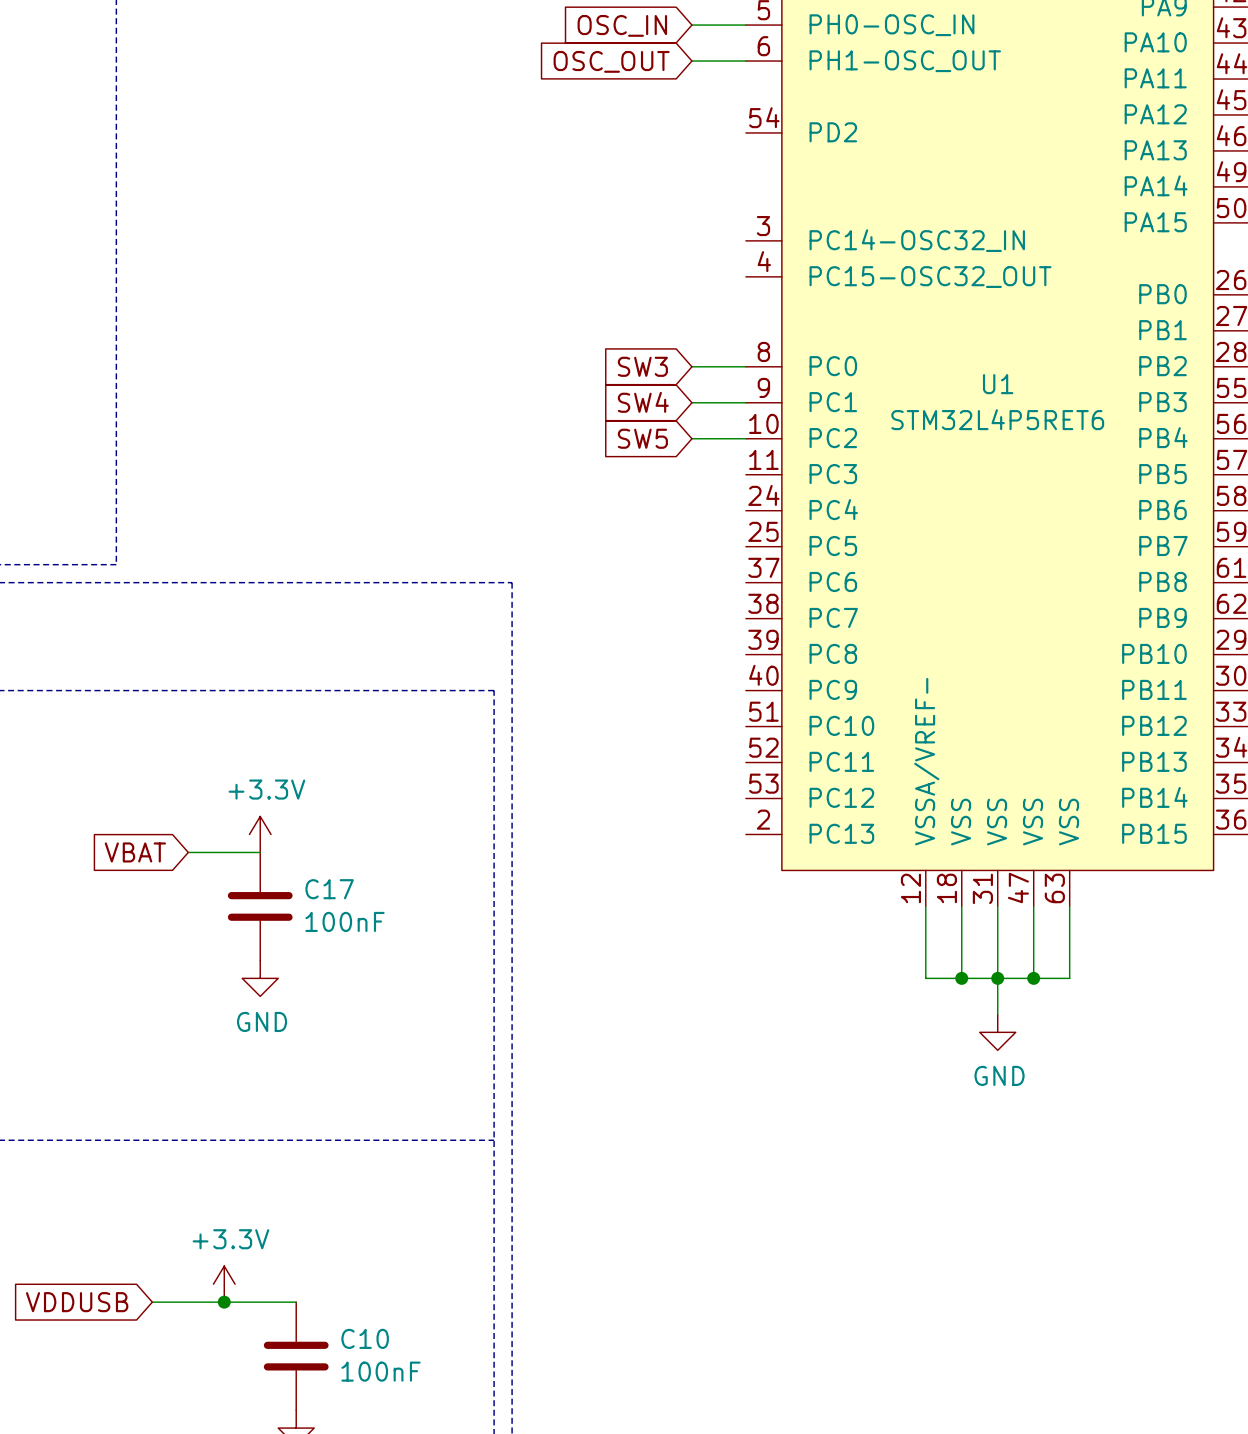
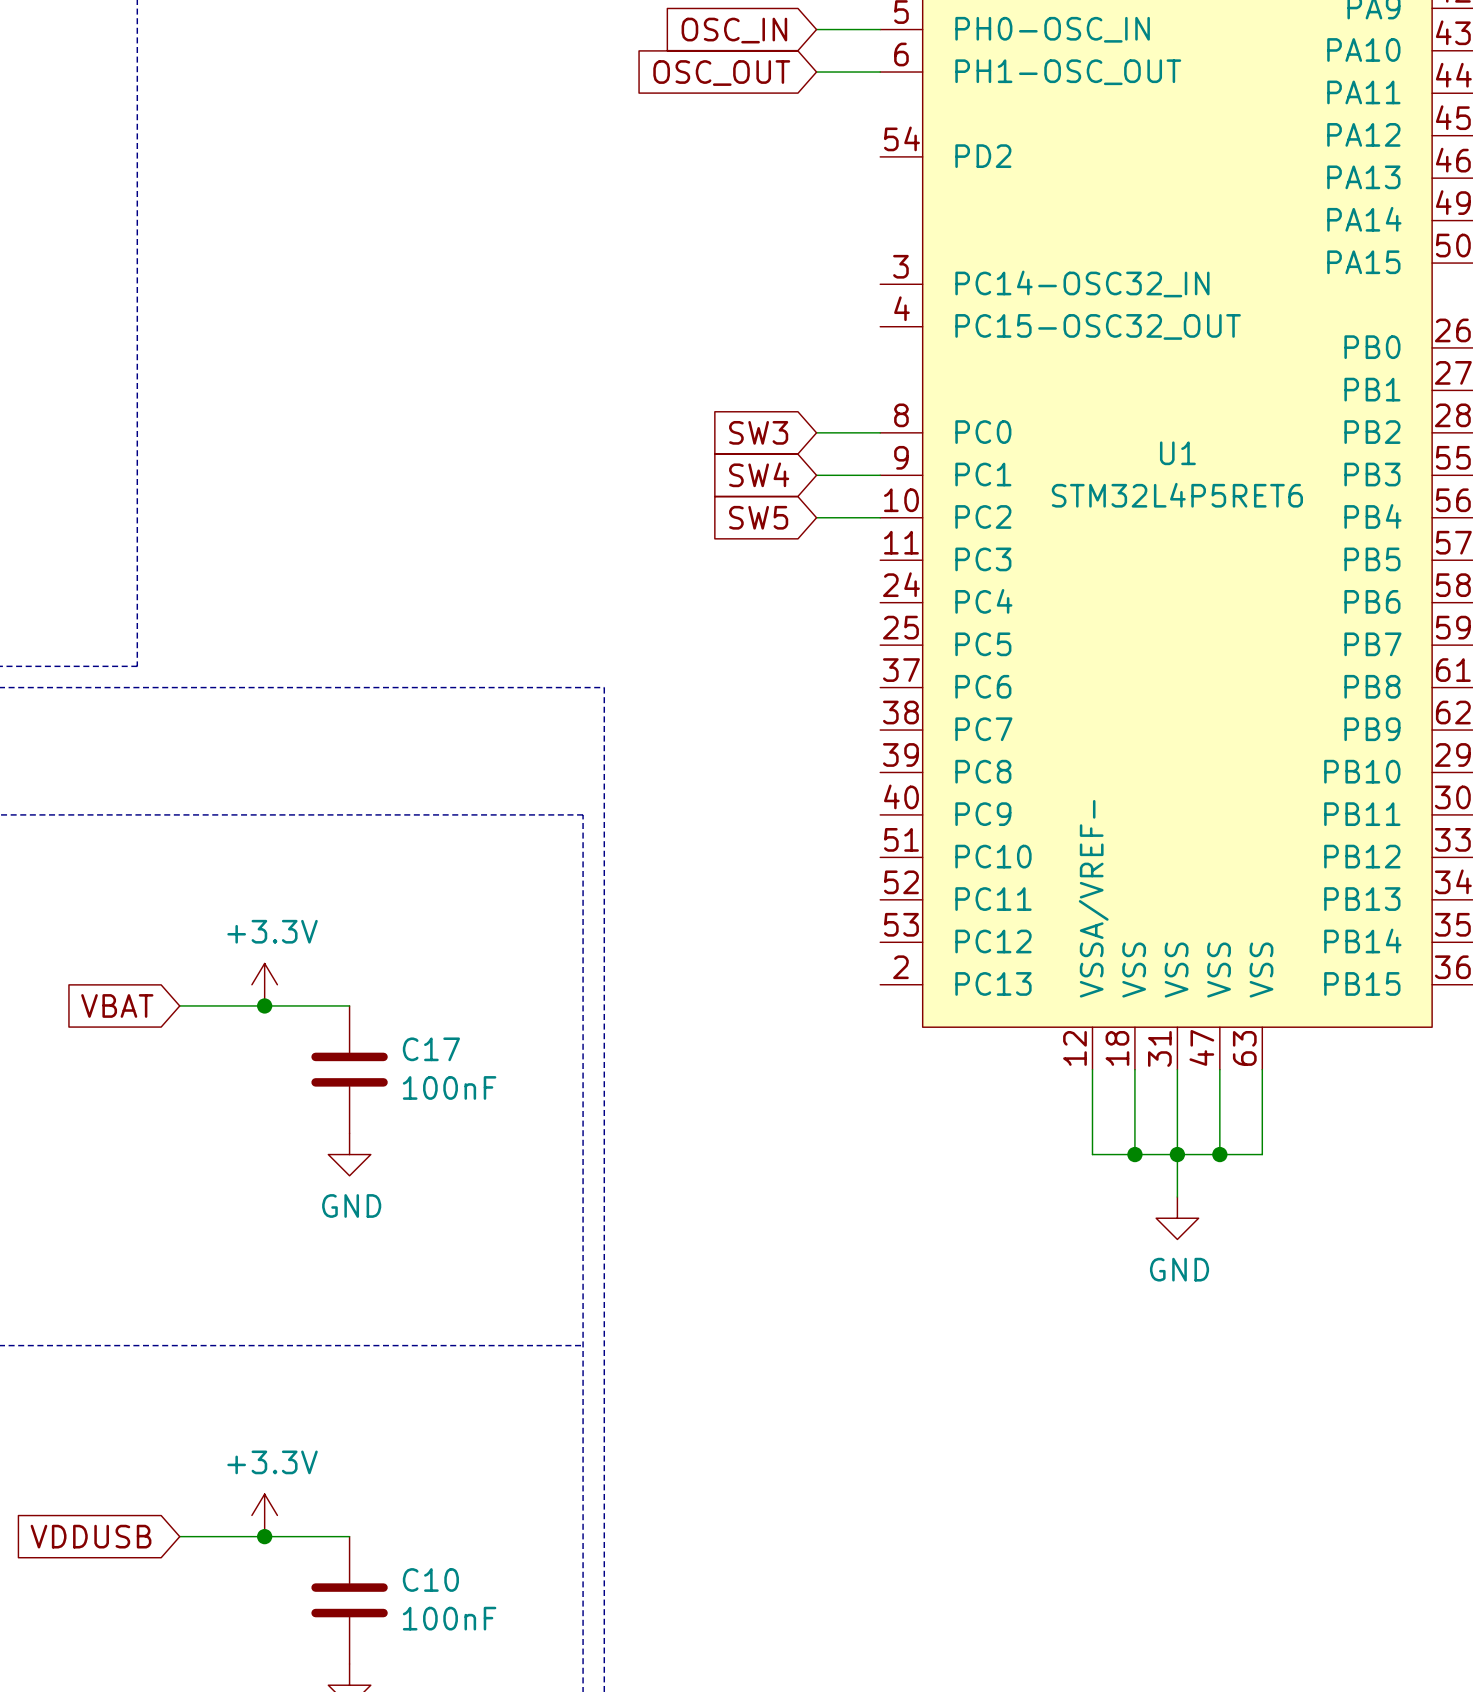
power symbol position: +3.3V (260, 834) -> +3.3V (264, 984)
global label position: VBAT (135, 852) -> VBAT (117, 1005)
wire: none -> (179, 1005) (222, 1005)
junction: none -> (264, 1005)
wire: none -> (307, 1005) (349, 1005)
C17 position: (260, 906) -> (349, 1069)
power symbol position: GND (260, 978) -> GND (349, 1154)

